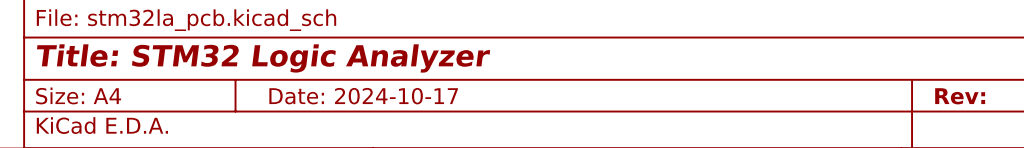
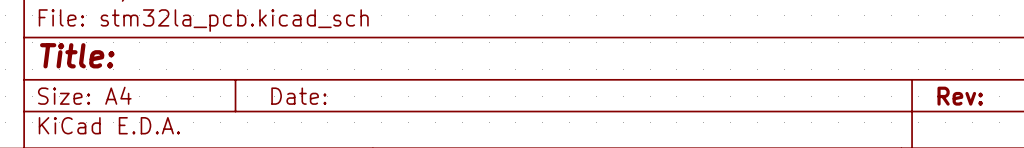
title block: Title: STM32 Logic Analyzer (263, 58) -> Title: (77, 55)
title block: Date: 2024-10-17 (363, 96) -> Date: (298, 96)

